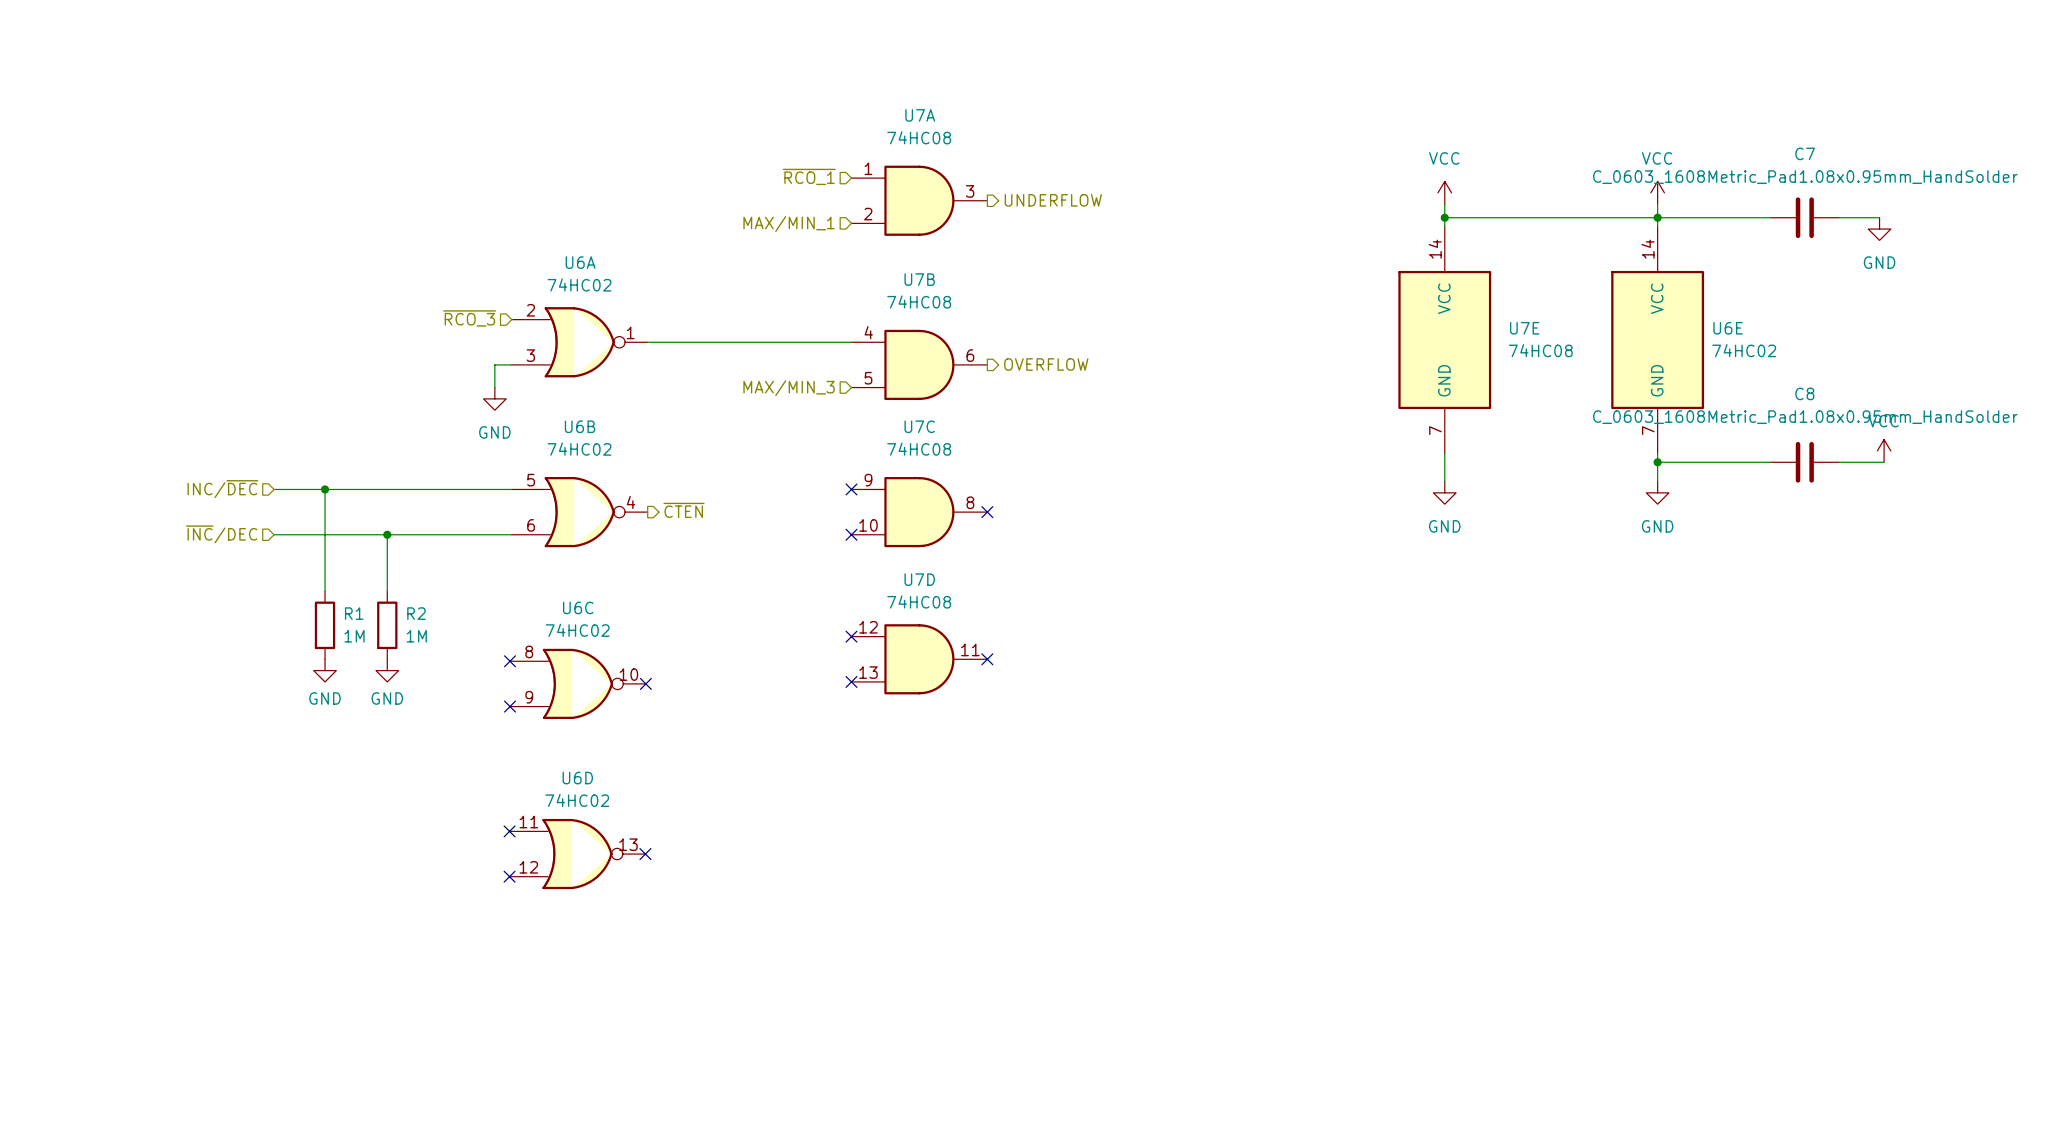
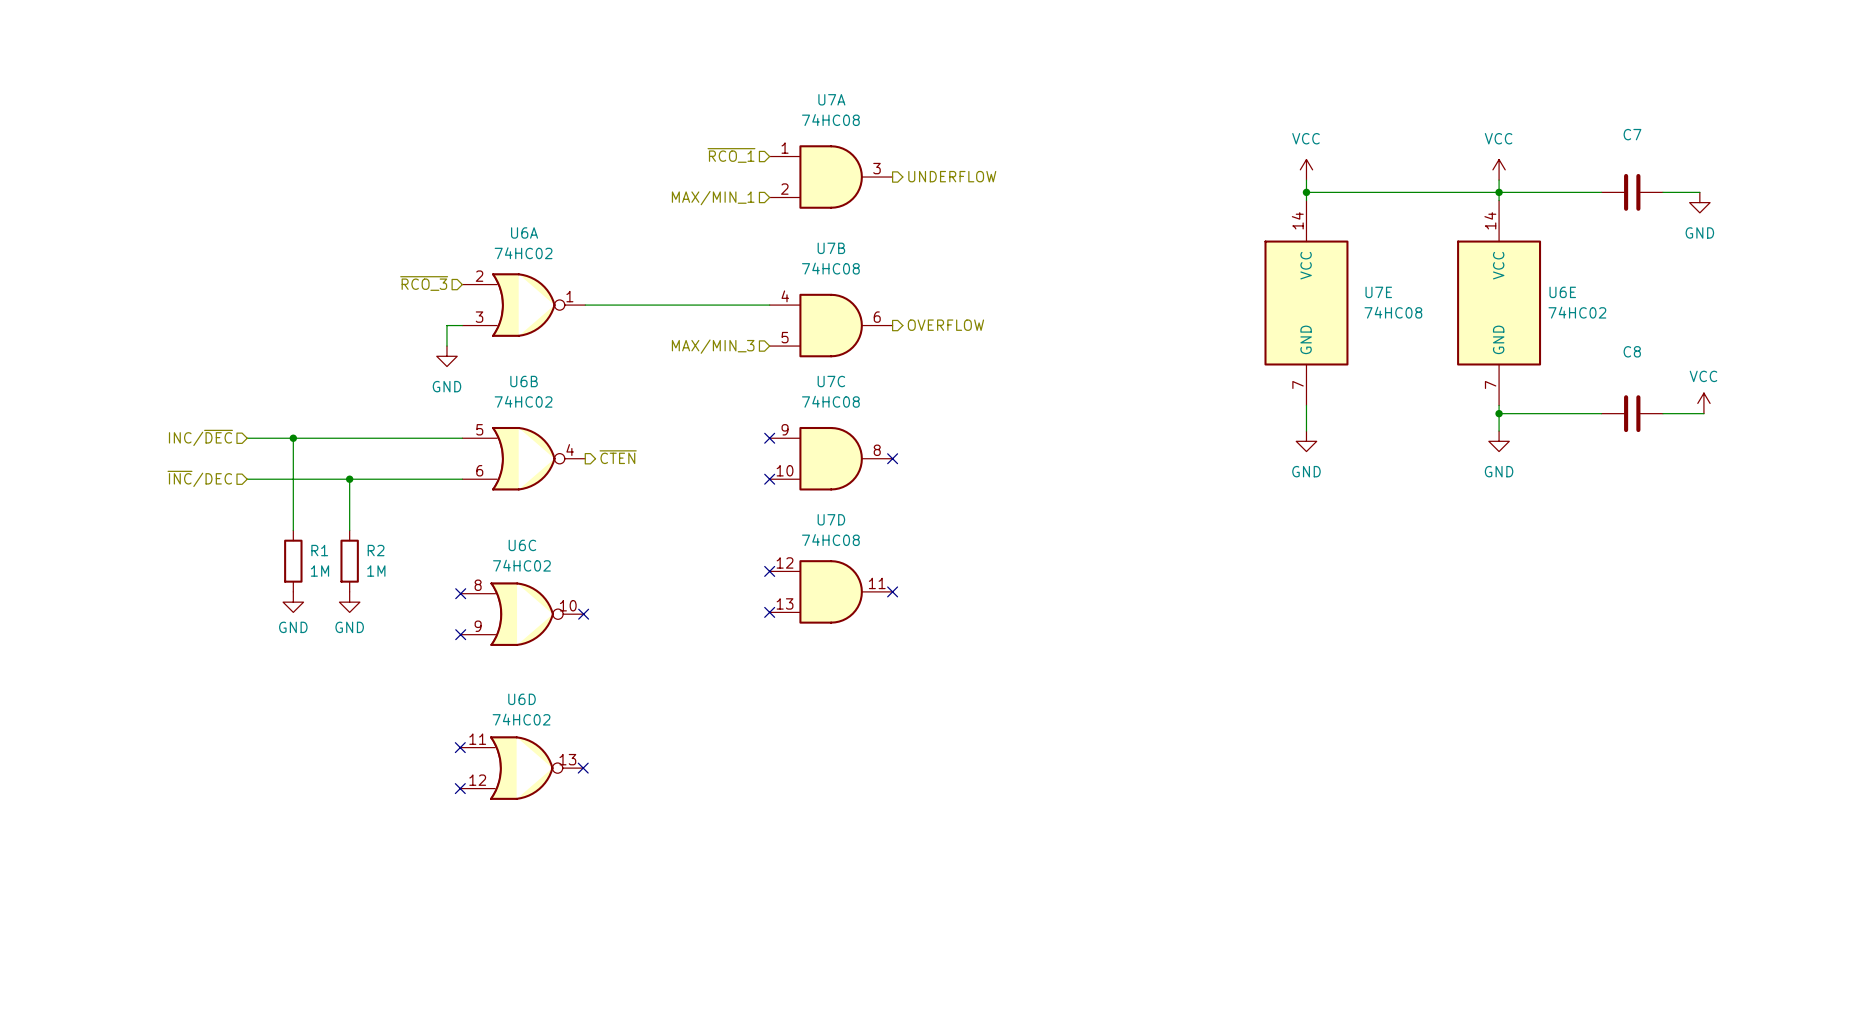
C7 value: C_0603_1608Metric_Pad1.08x0.95mm_HandSolder (1805, 177) -> none
C8 value: C_0603_1608Metric_Pad1.08x0.95mm_HandSolder (1805, 417) -> none

